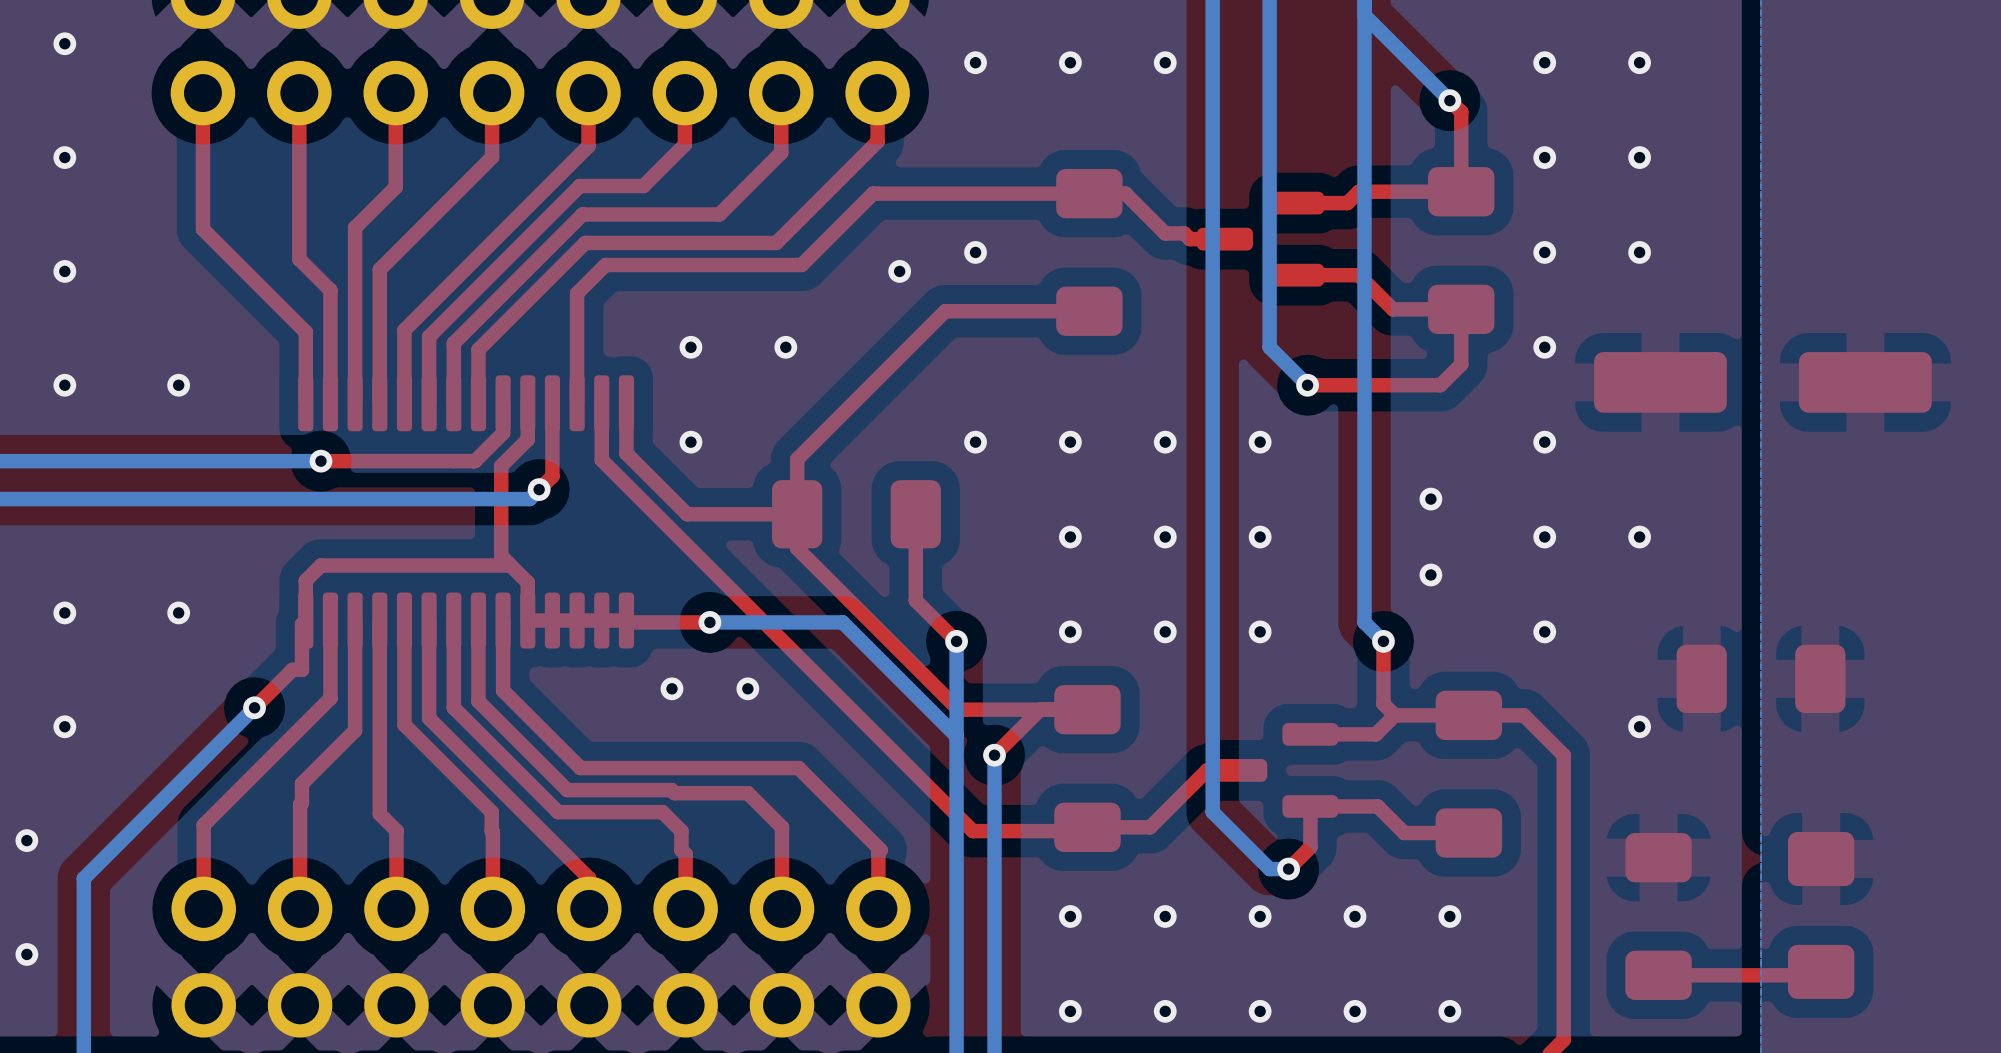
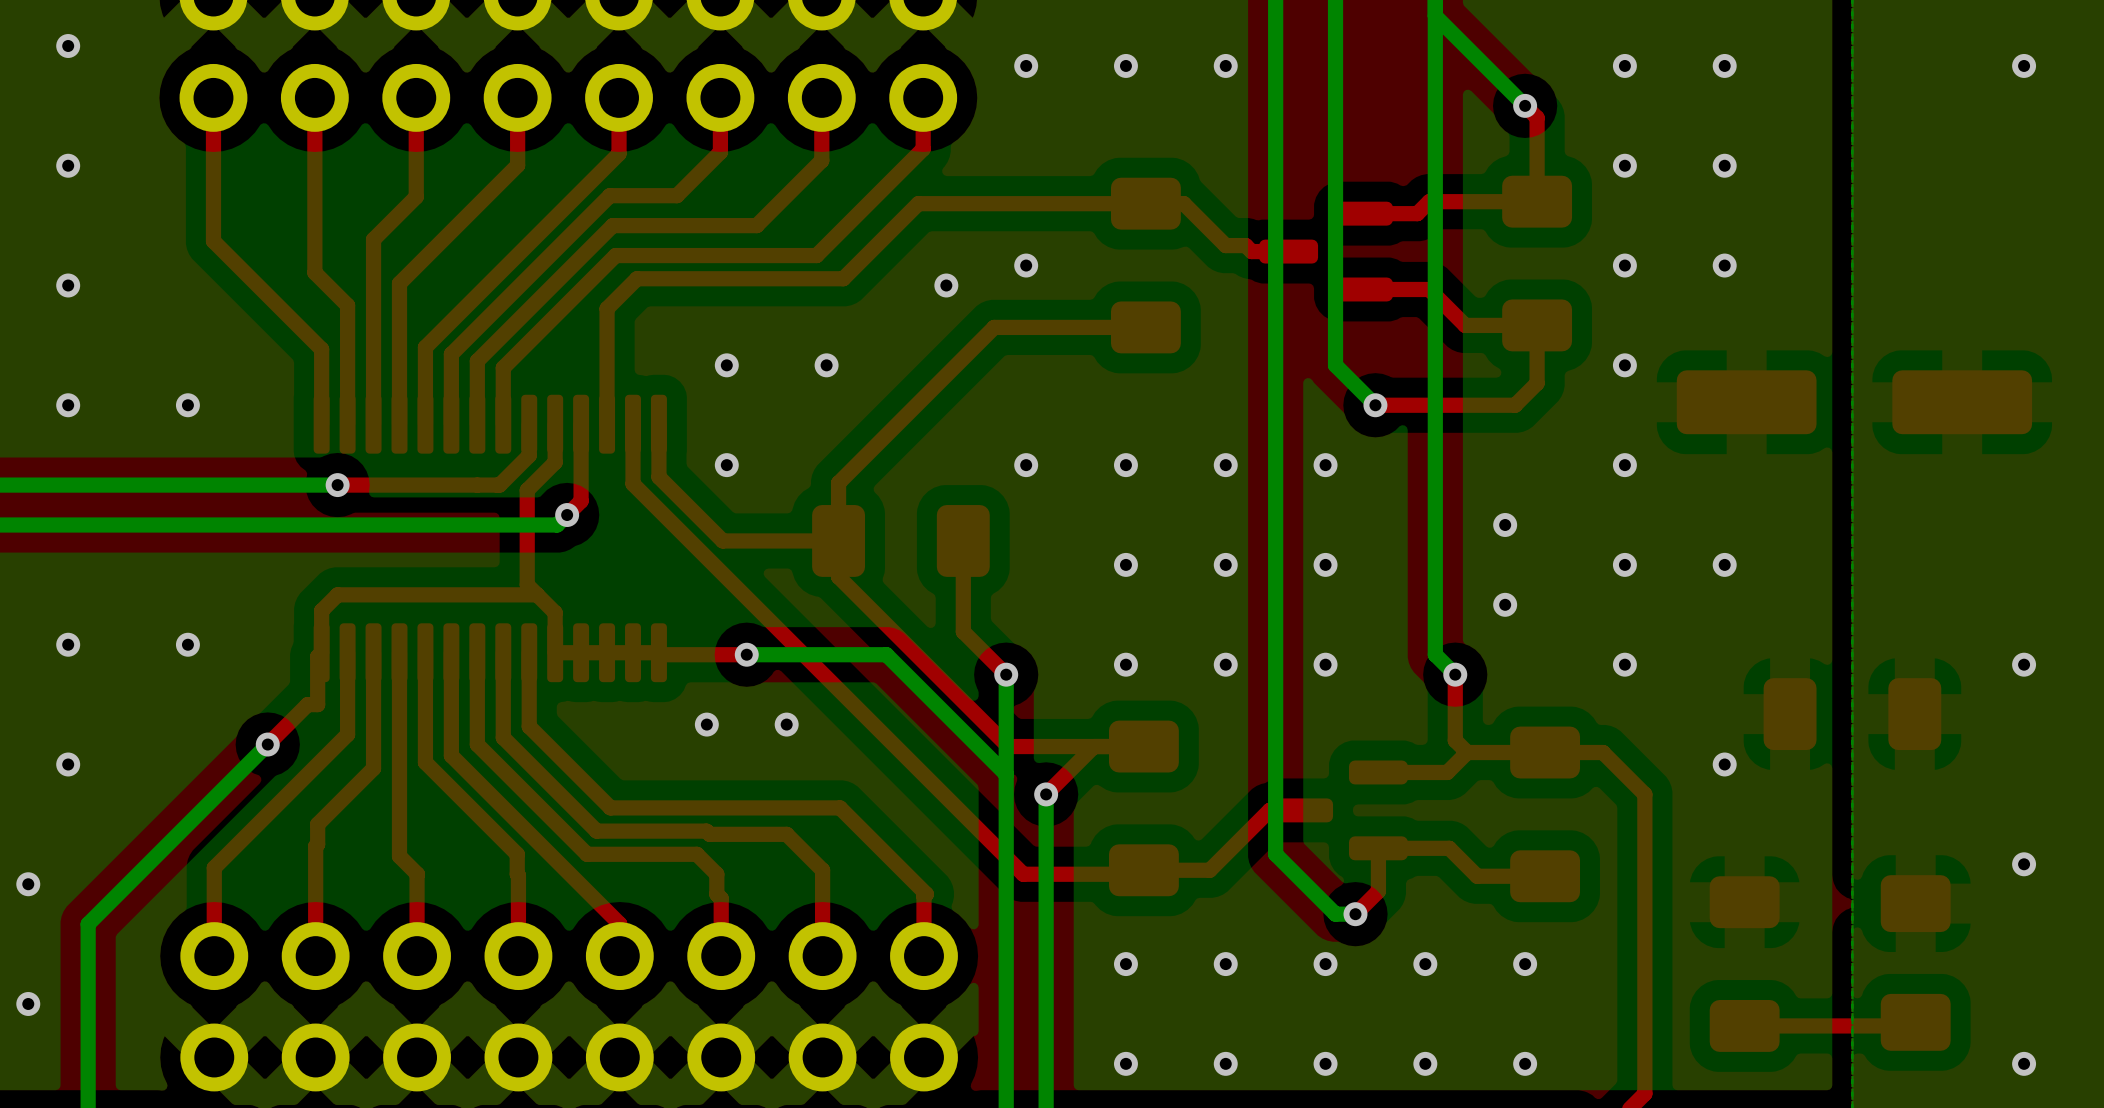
via: none -> (2024, 65)
via: none -> (2024, 664)
via: none -> (2024, 864)
via: none -> (2024, 1063)

